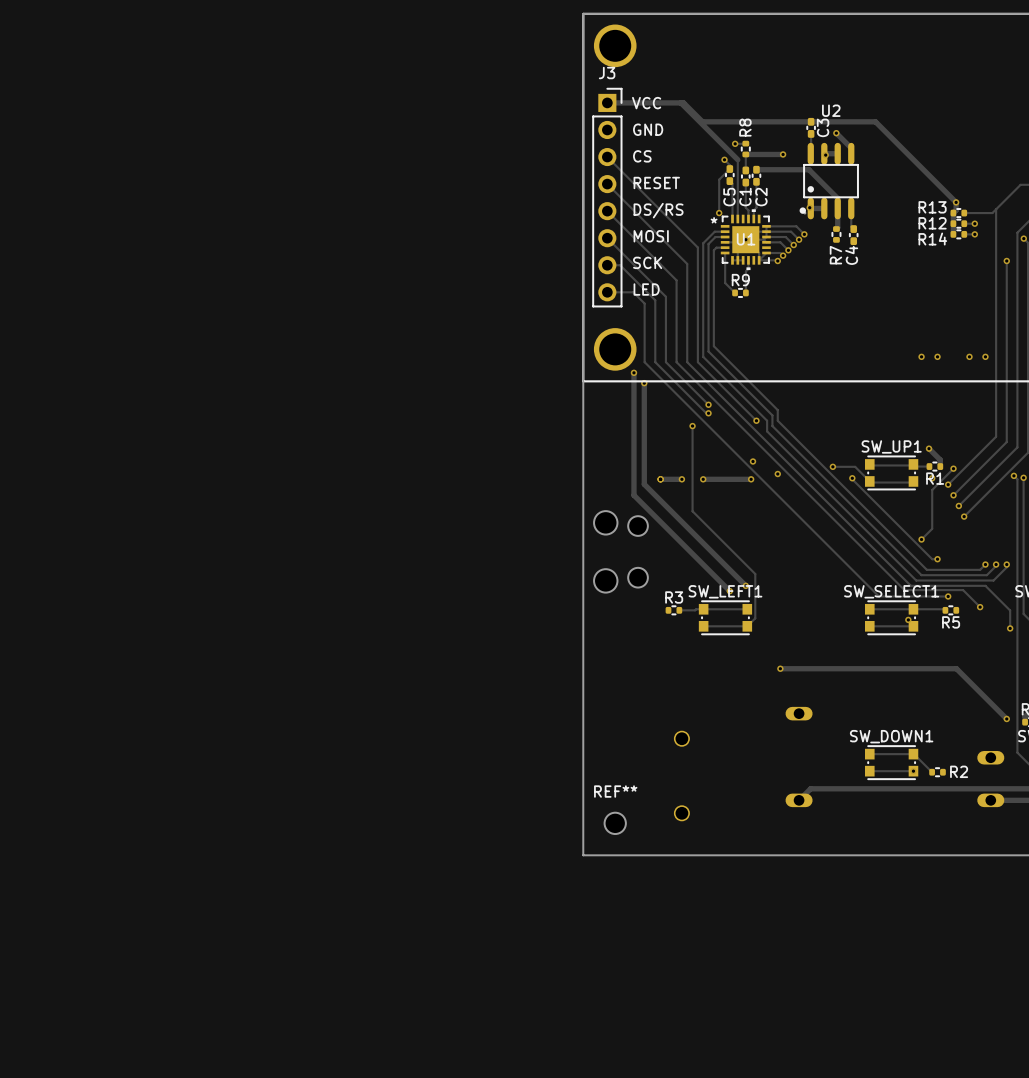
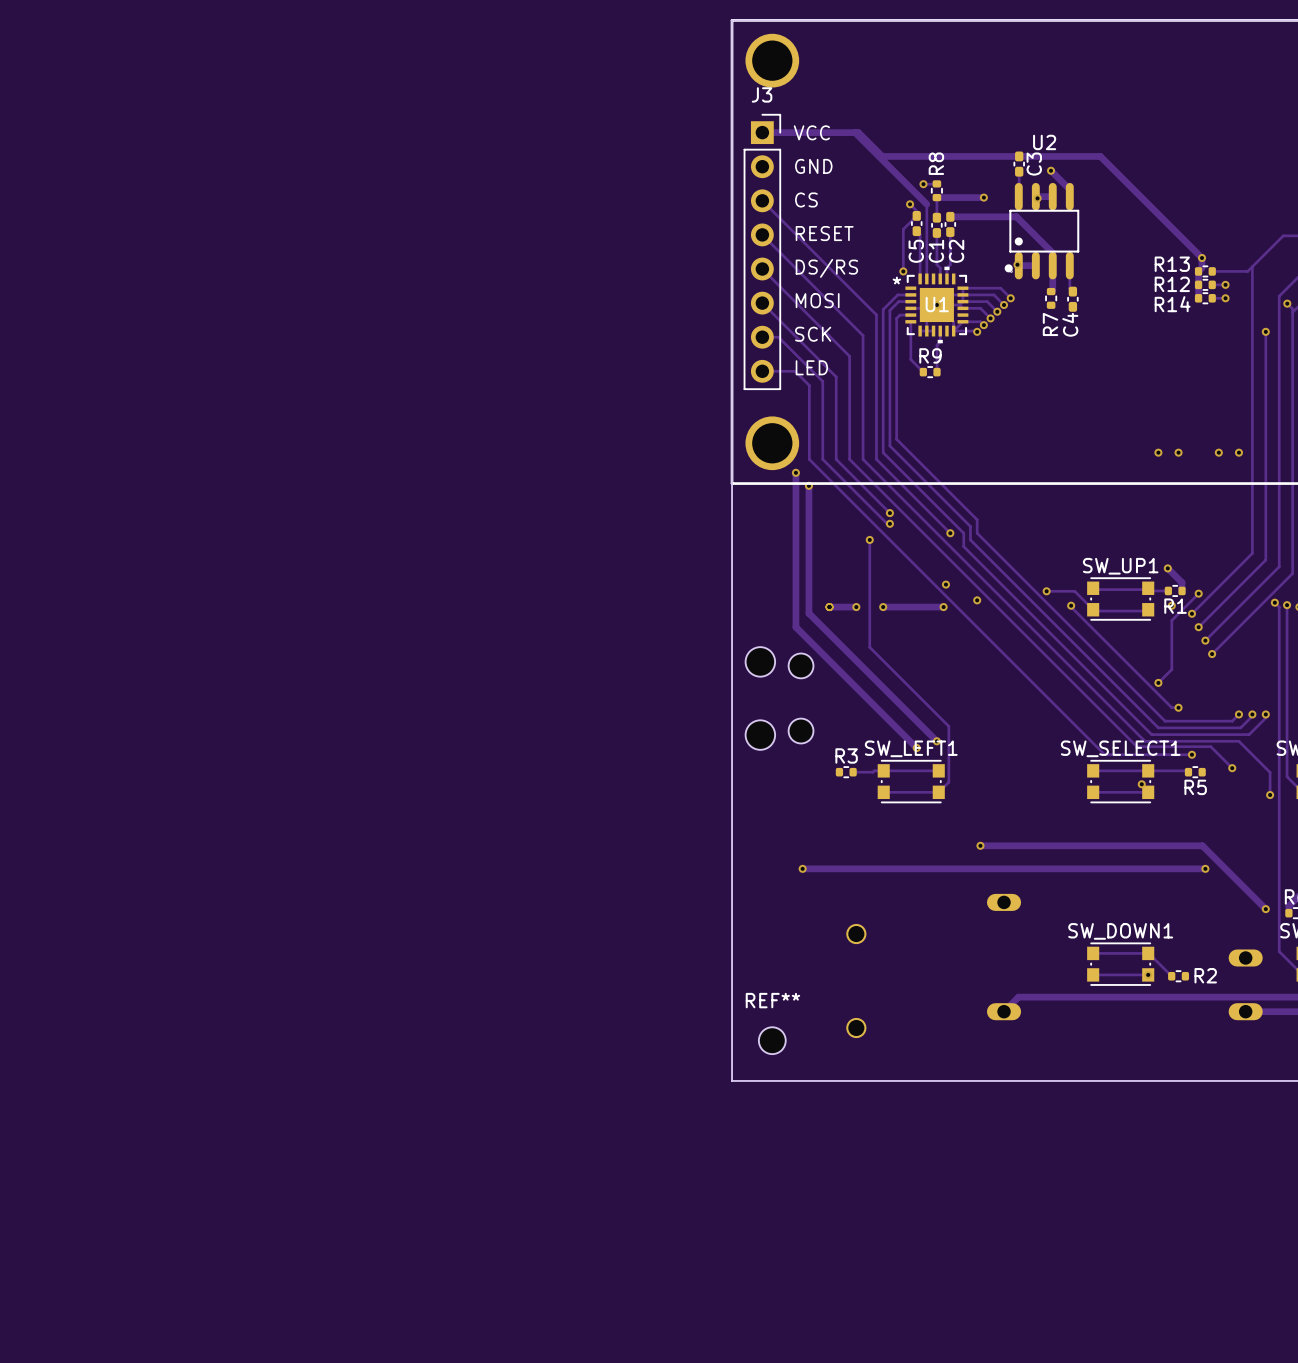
track: none -> (802, 868) (1205, 868)
via: none -> (802, 868)
via: none -> (1205, 868)

